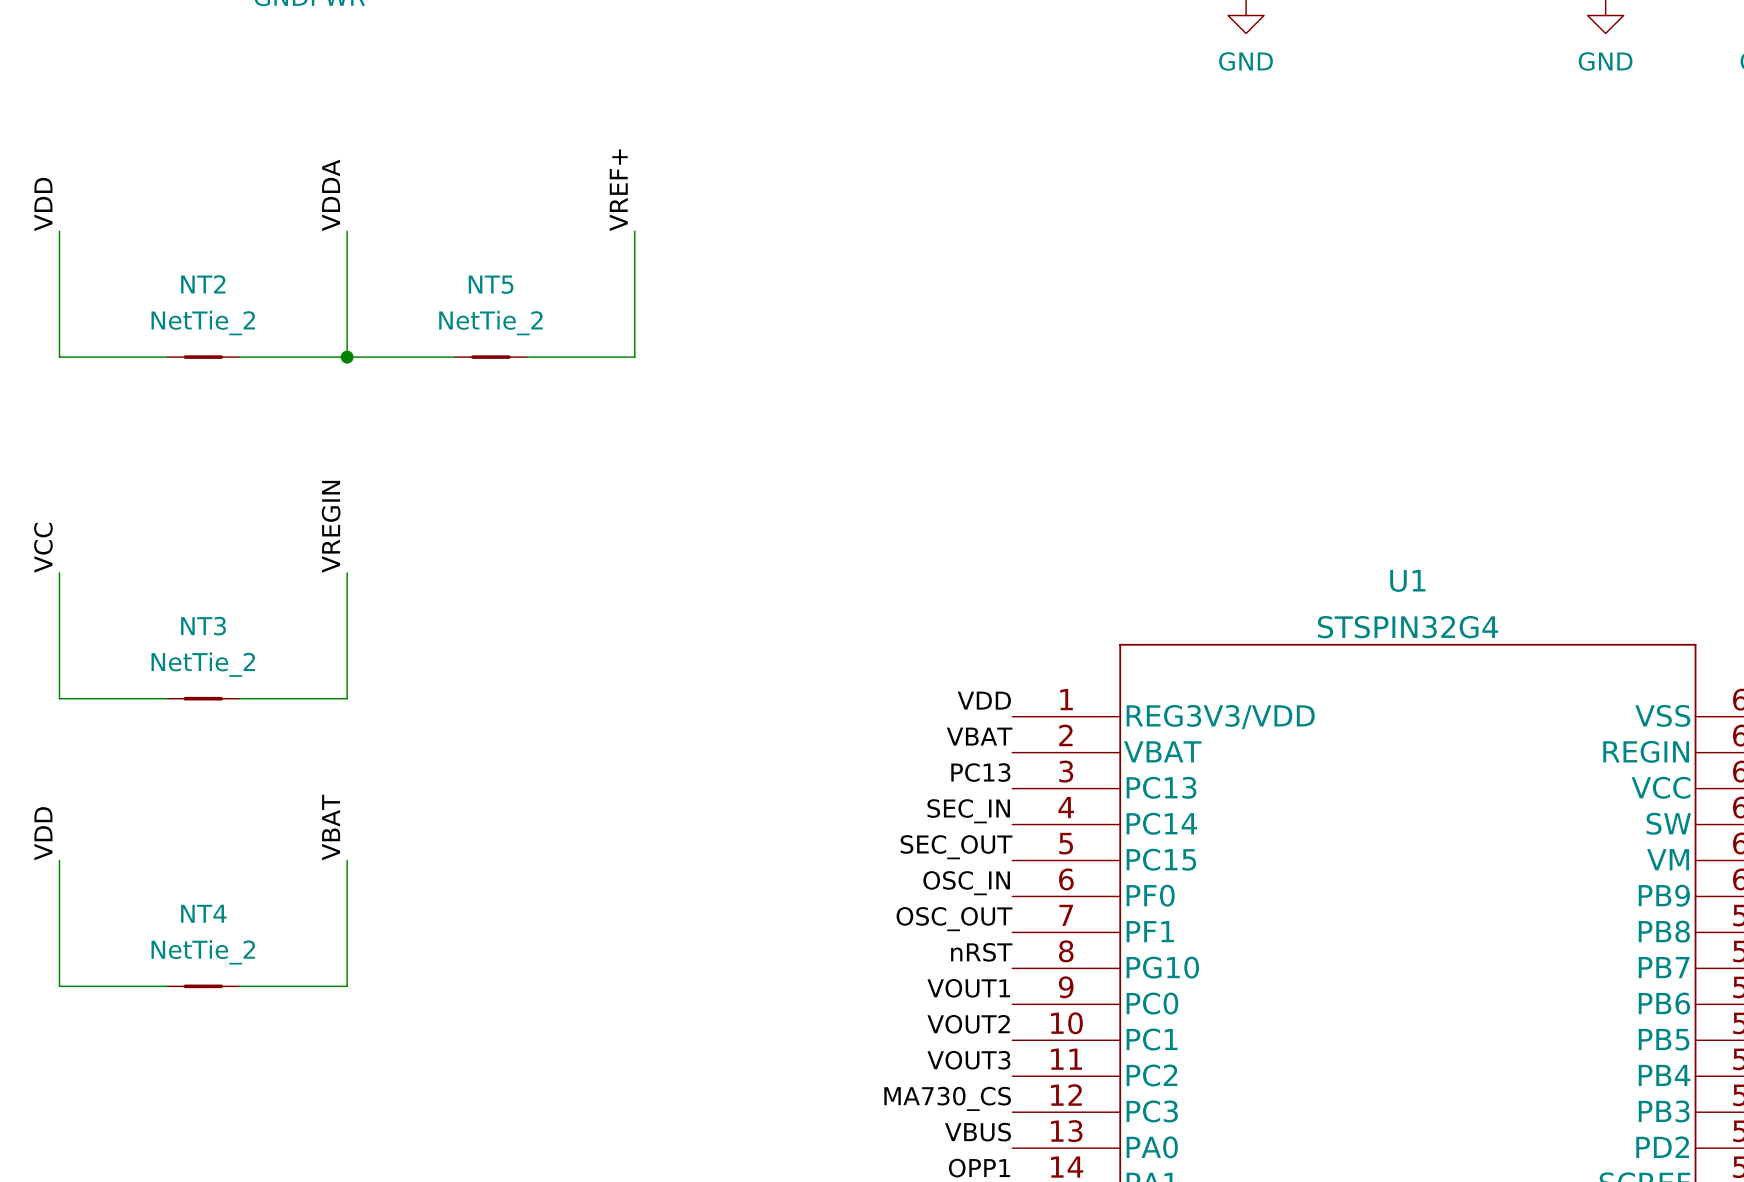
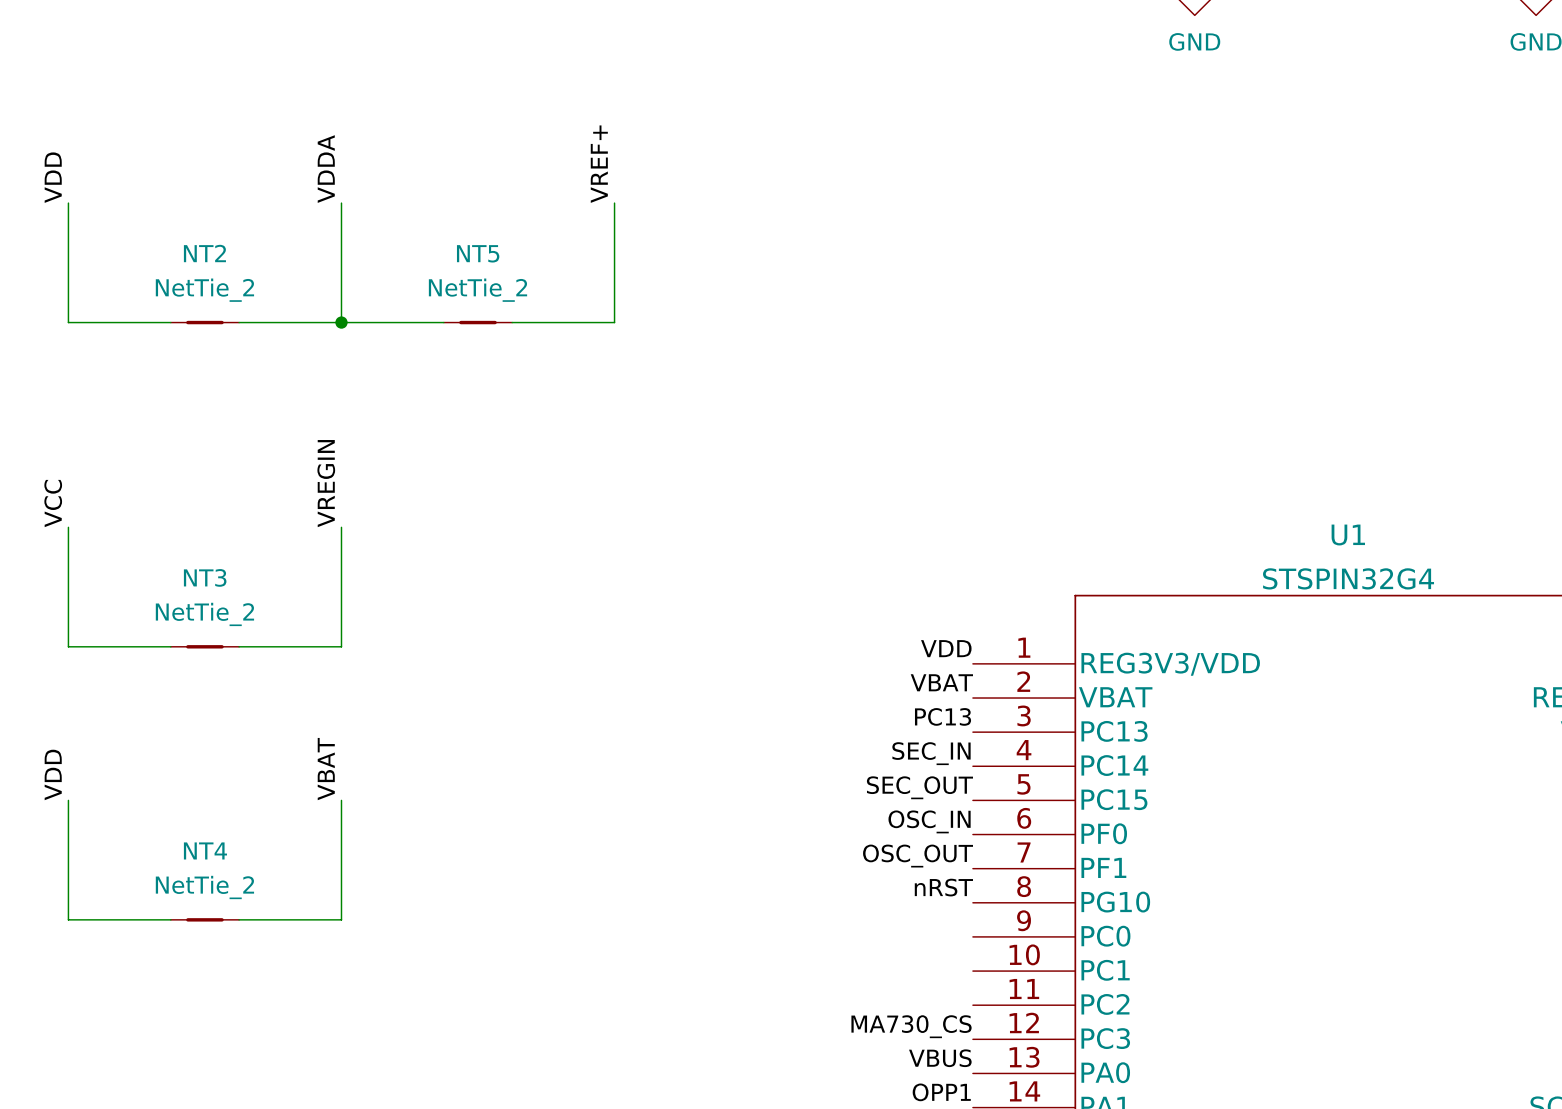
label: VOUT1 (968, 988) -> none
label: VOUT2 (968, 1024) -> none
label: VOUT3 (968, 1060) -> none

